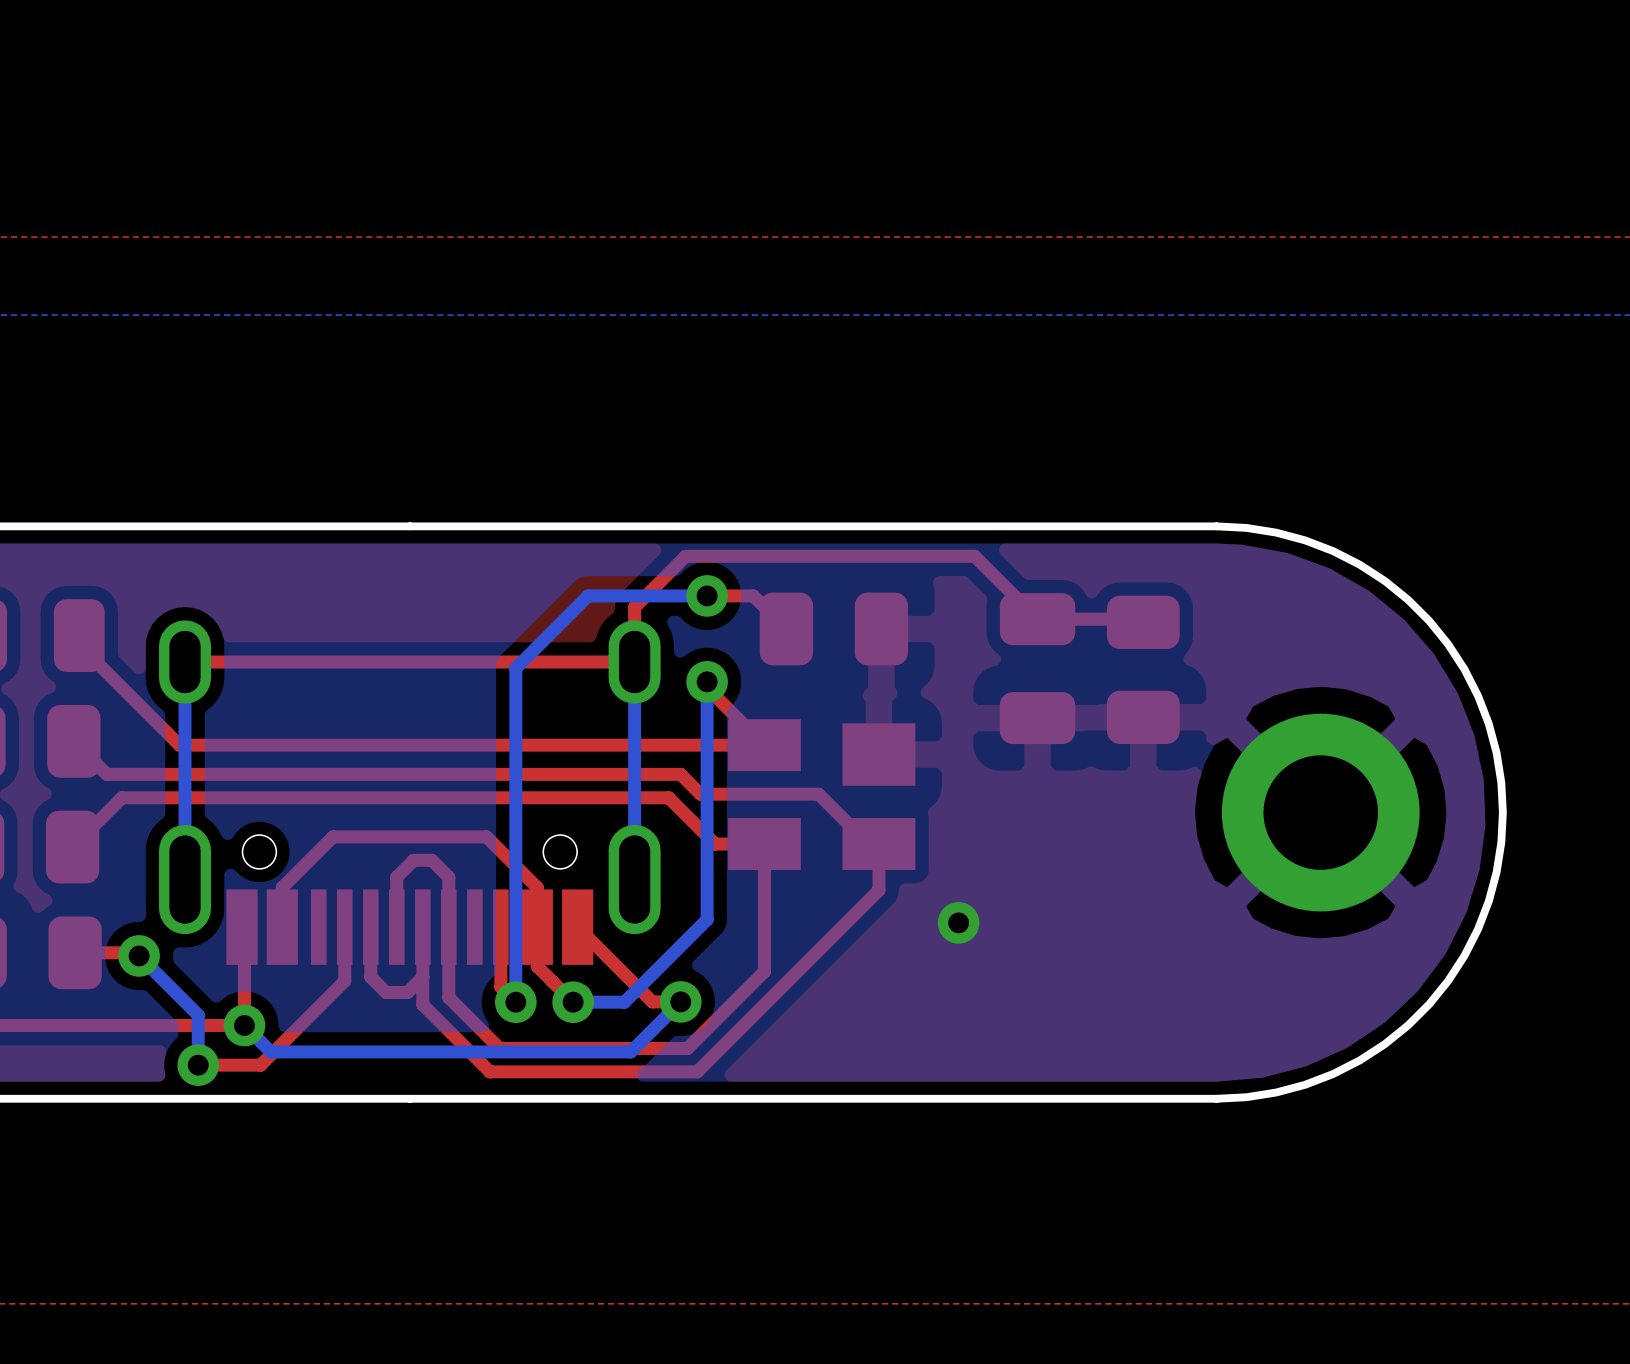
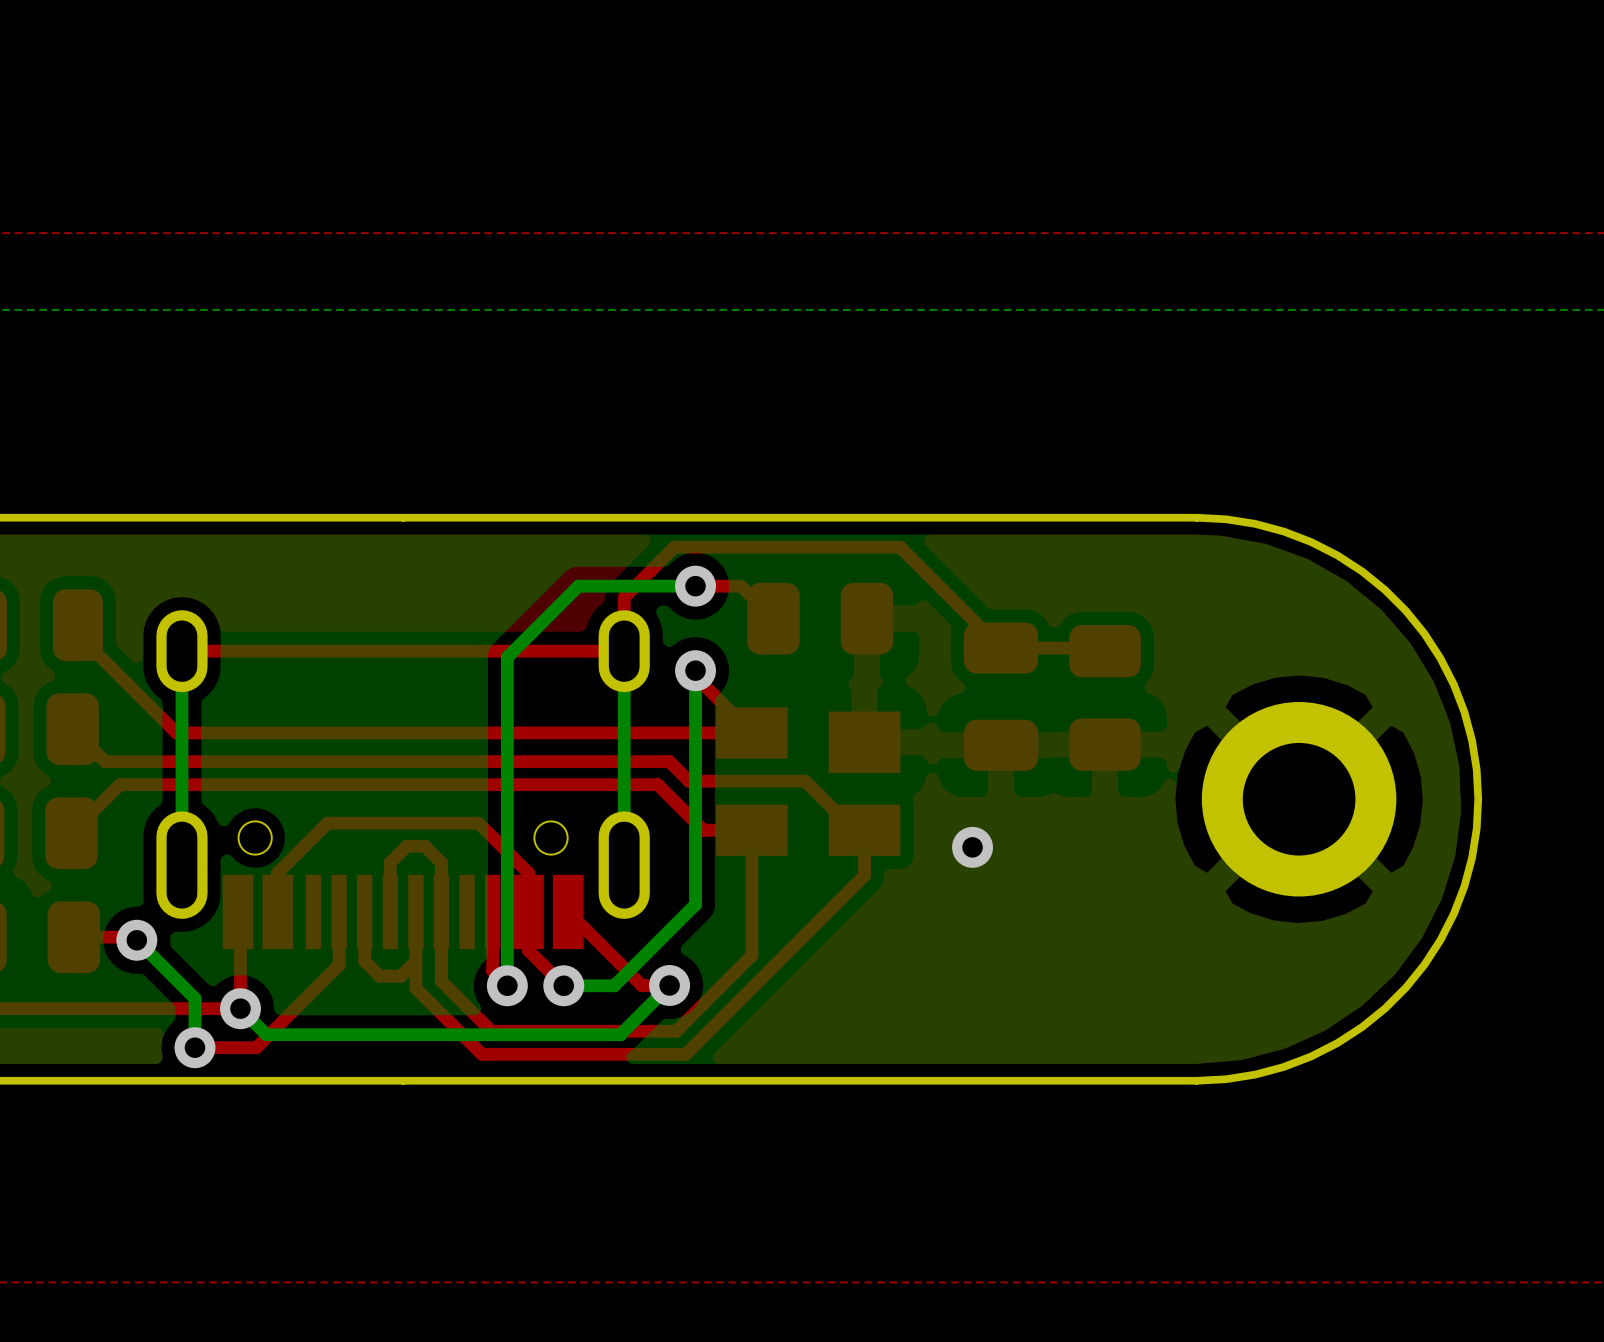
top track: (915, 556) (974, 556) (1037, 619) (1140, 619) (1143, 622) -> (900, 547) (1001, 648) (1101, 648) (1105, 651)
part position: (1037, 668) -> (1001, 696)
part position: (1143, 669) -> (1105, 697)
via position: (958, 922) -> (972, 847)

